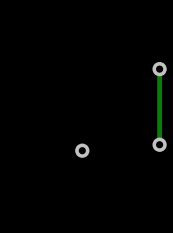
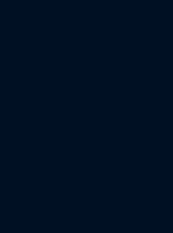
track: (159, 69) (159, 144) -> none
via: (159, 69) -> none
via: (159, 144) -> none
via: (82, 150) -> none

